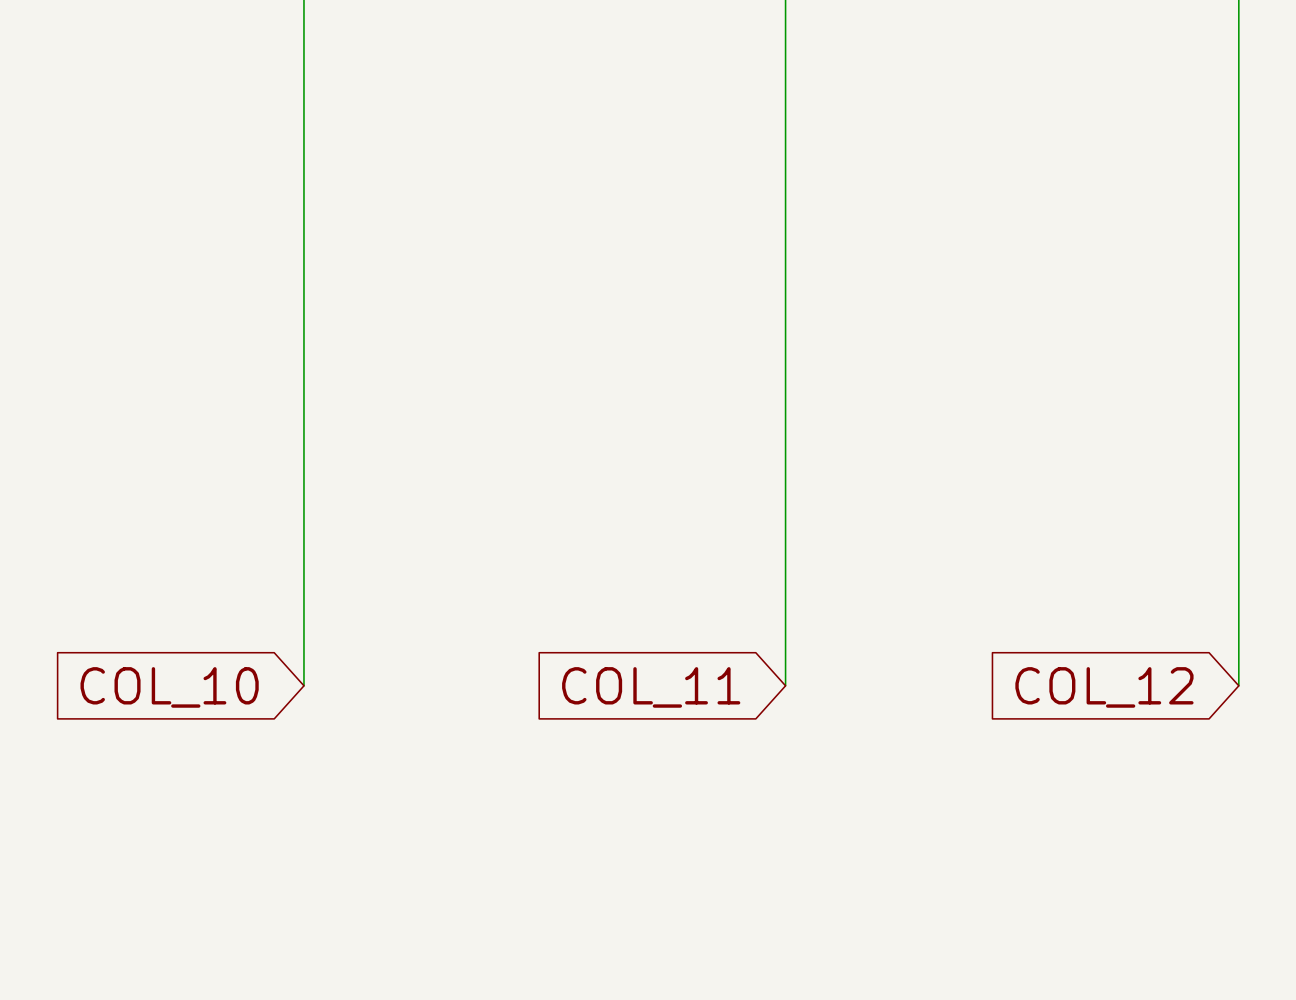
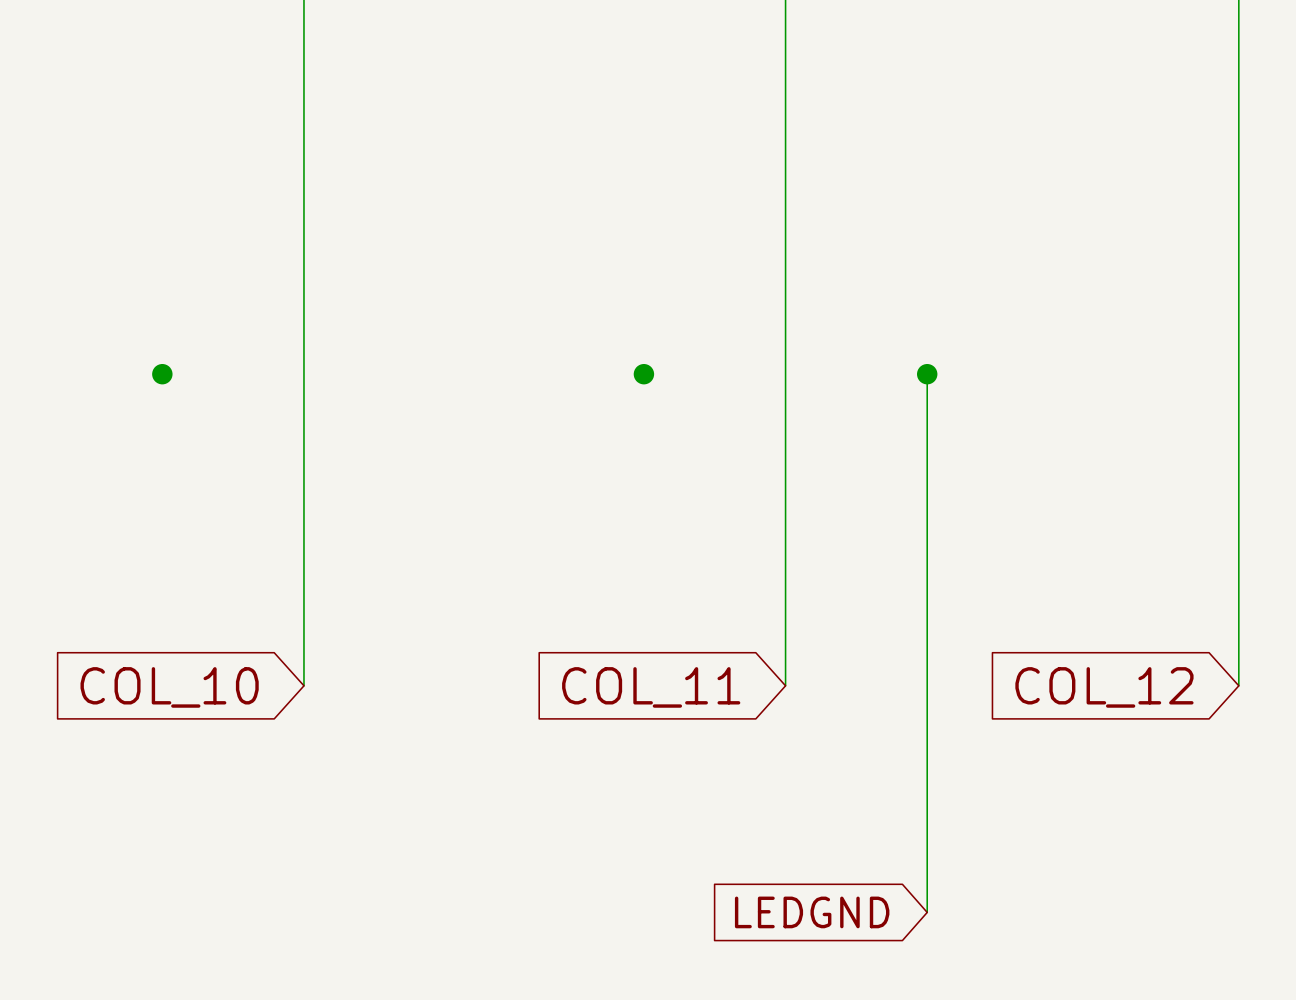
junction: none -> (162, 374)
junction: none -> (643, 374)
wire: none -> (927, 374) (927, 912)
junction: none -> (927, 374)
global label: none -> LEDGND (812, 912)

